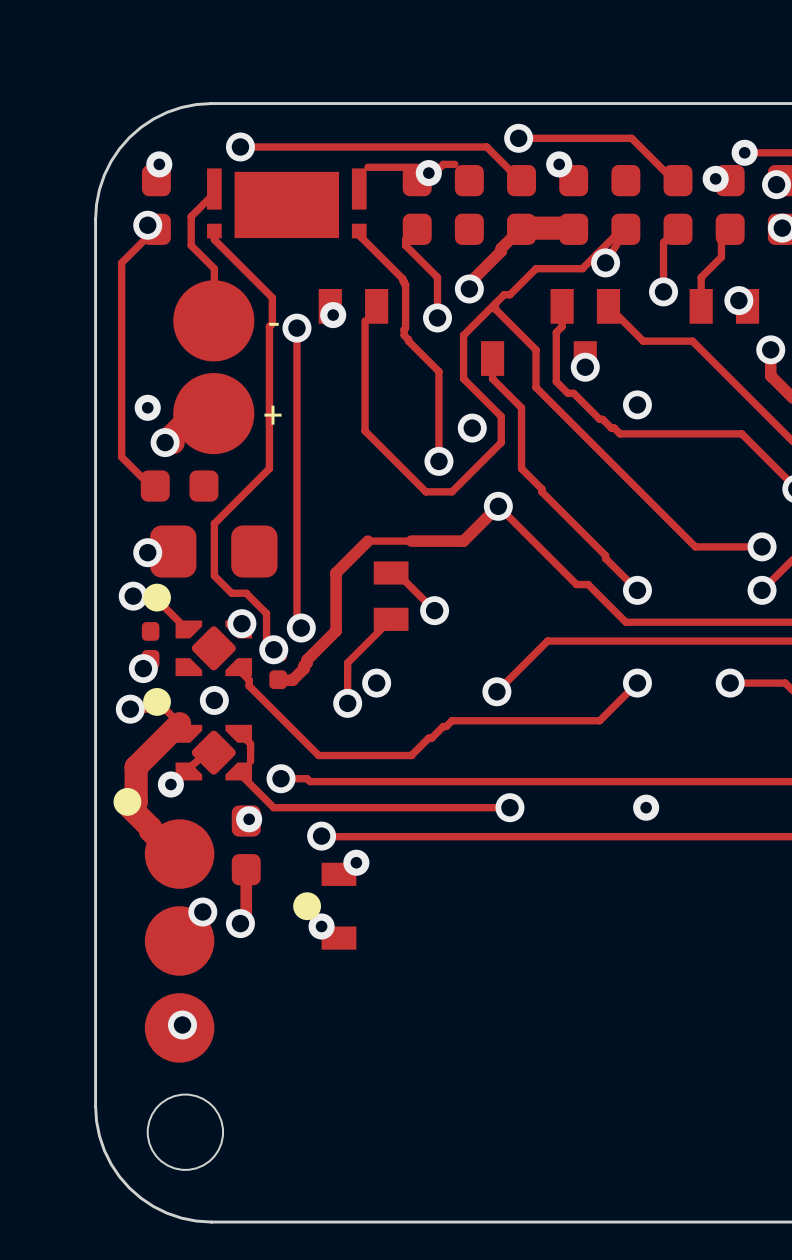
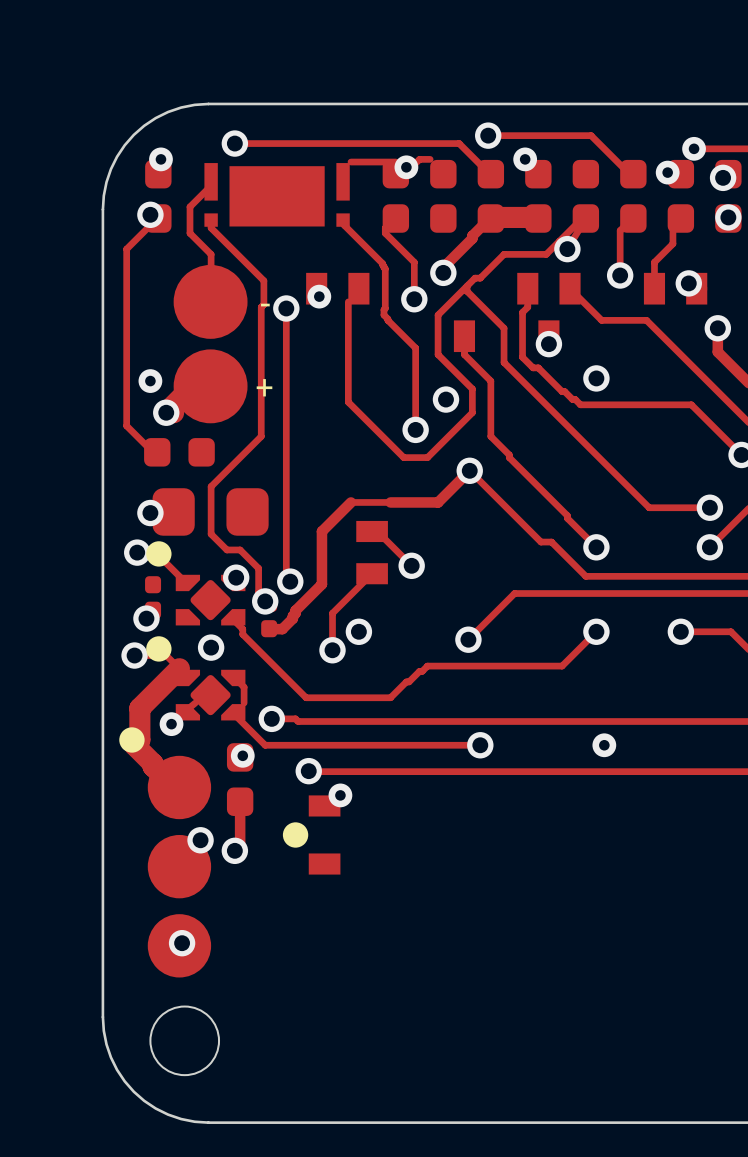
via: (321, 926) -> none

